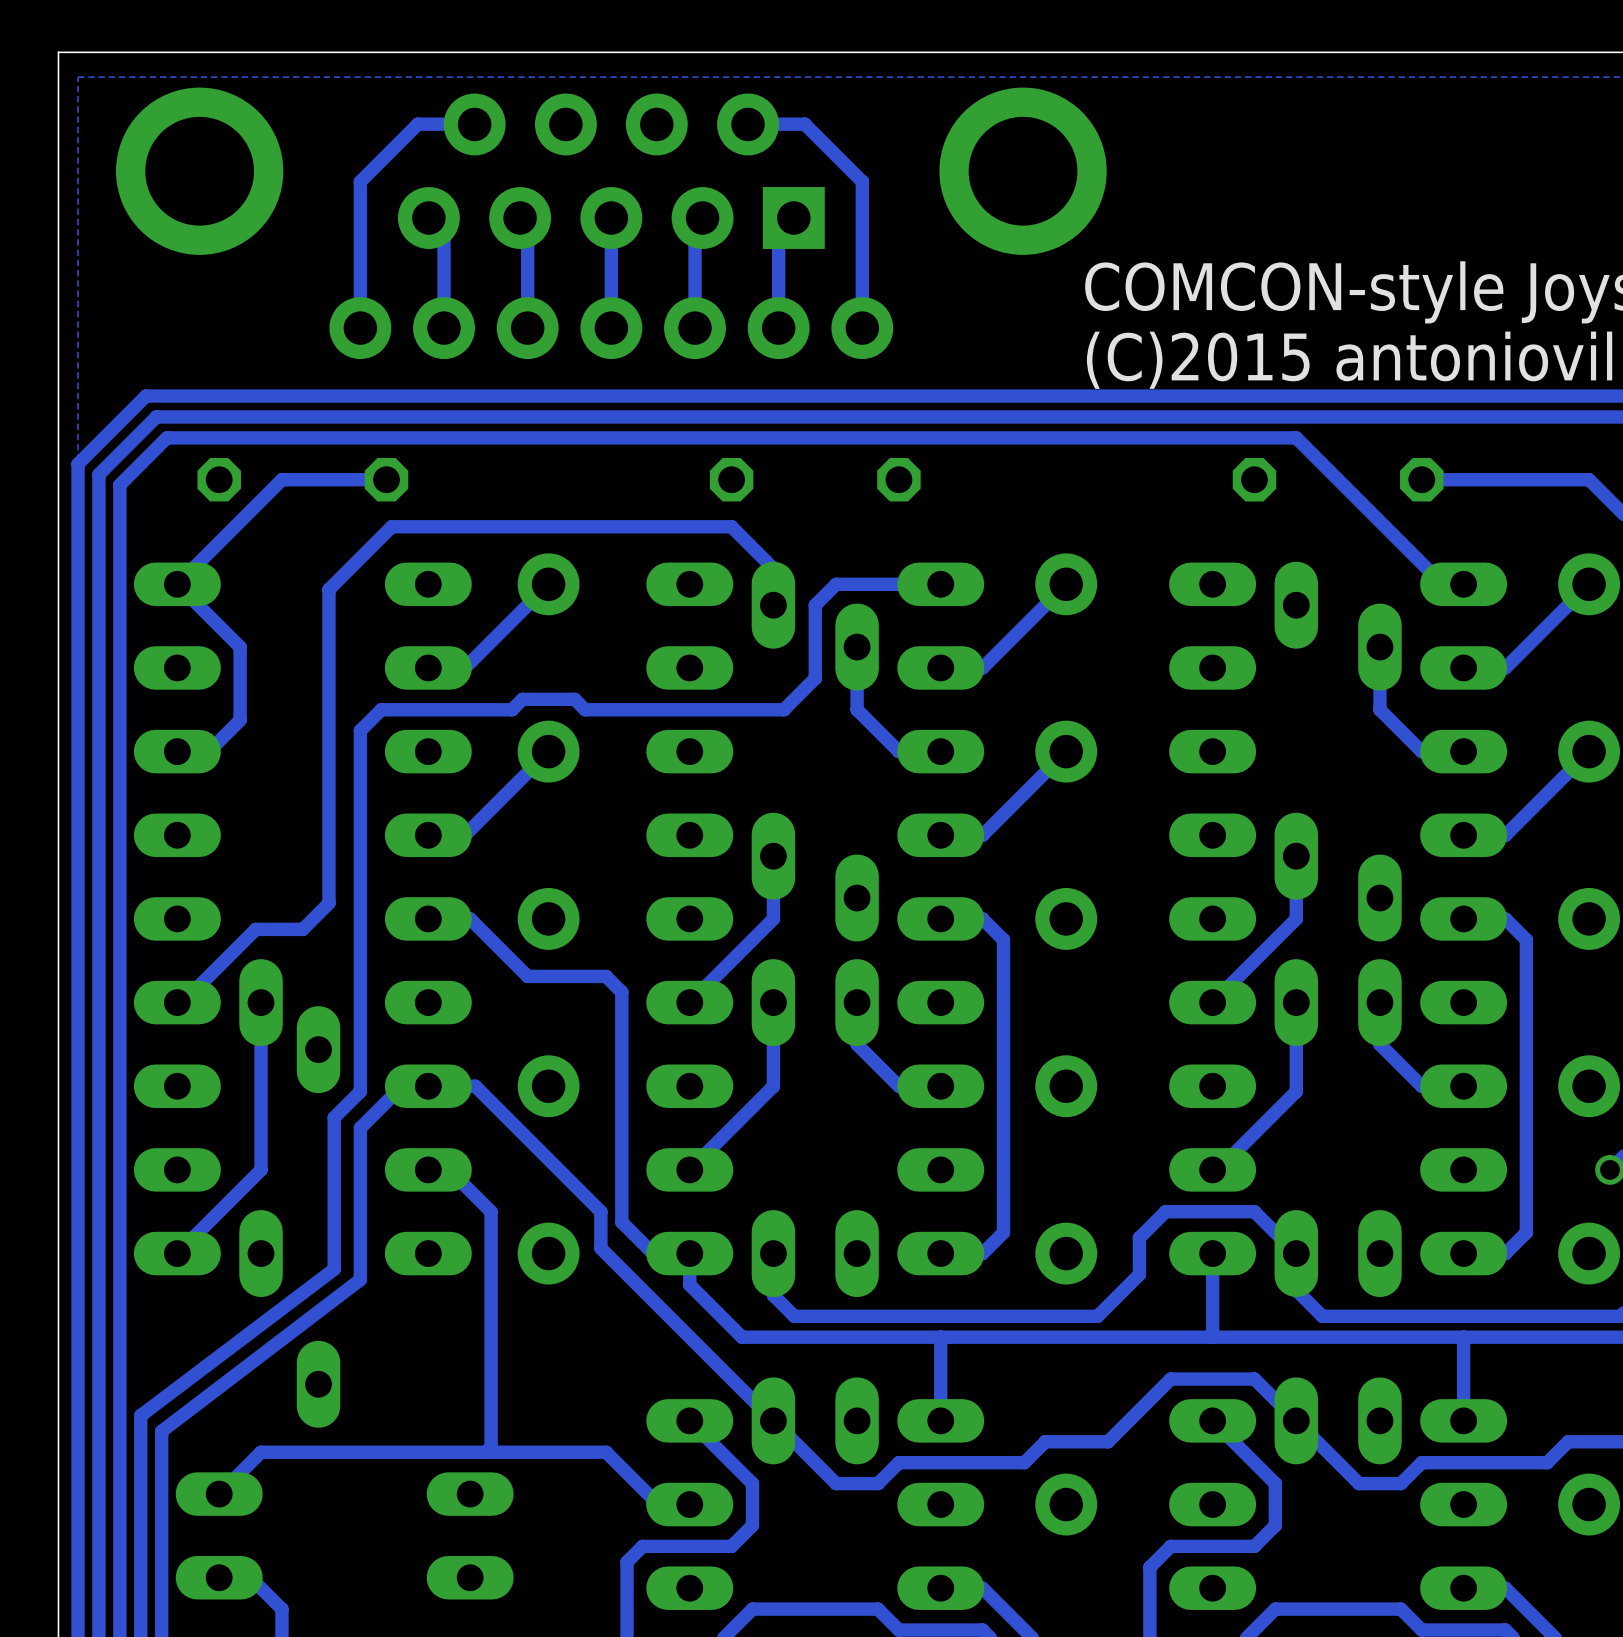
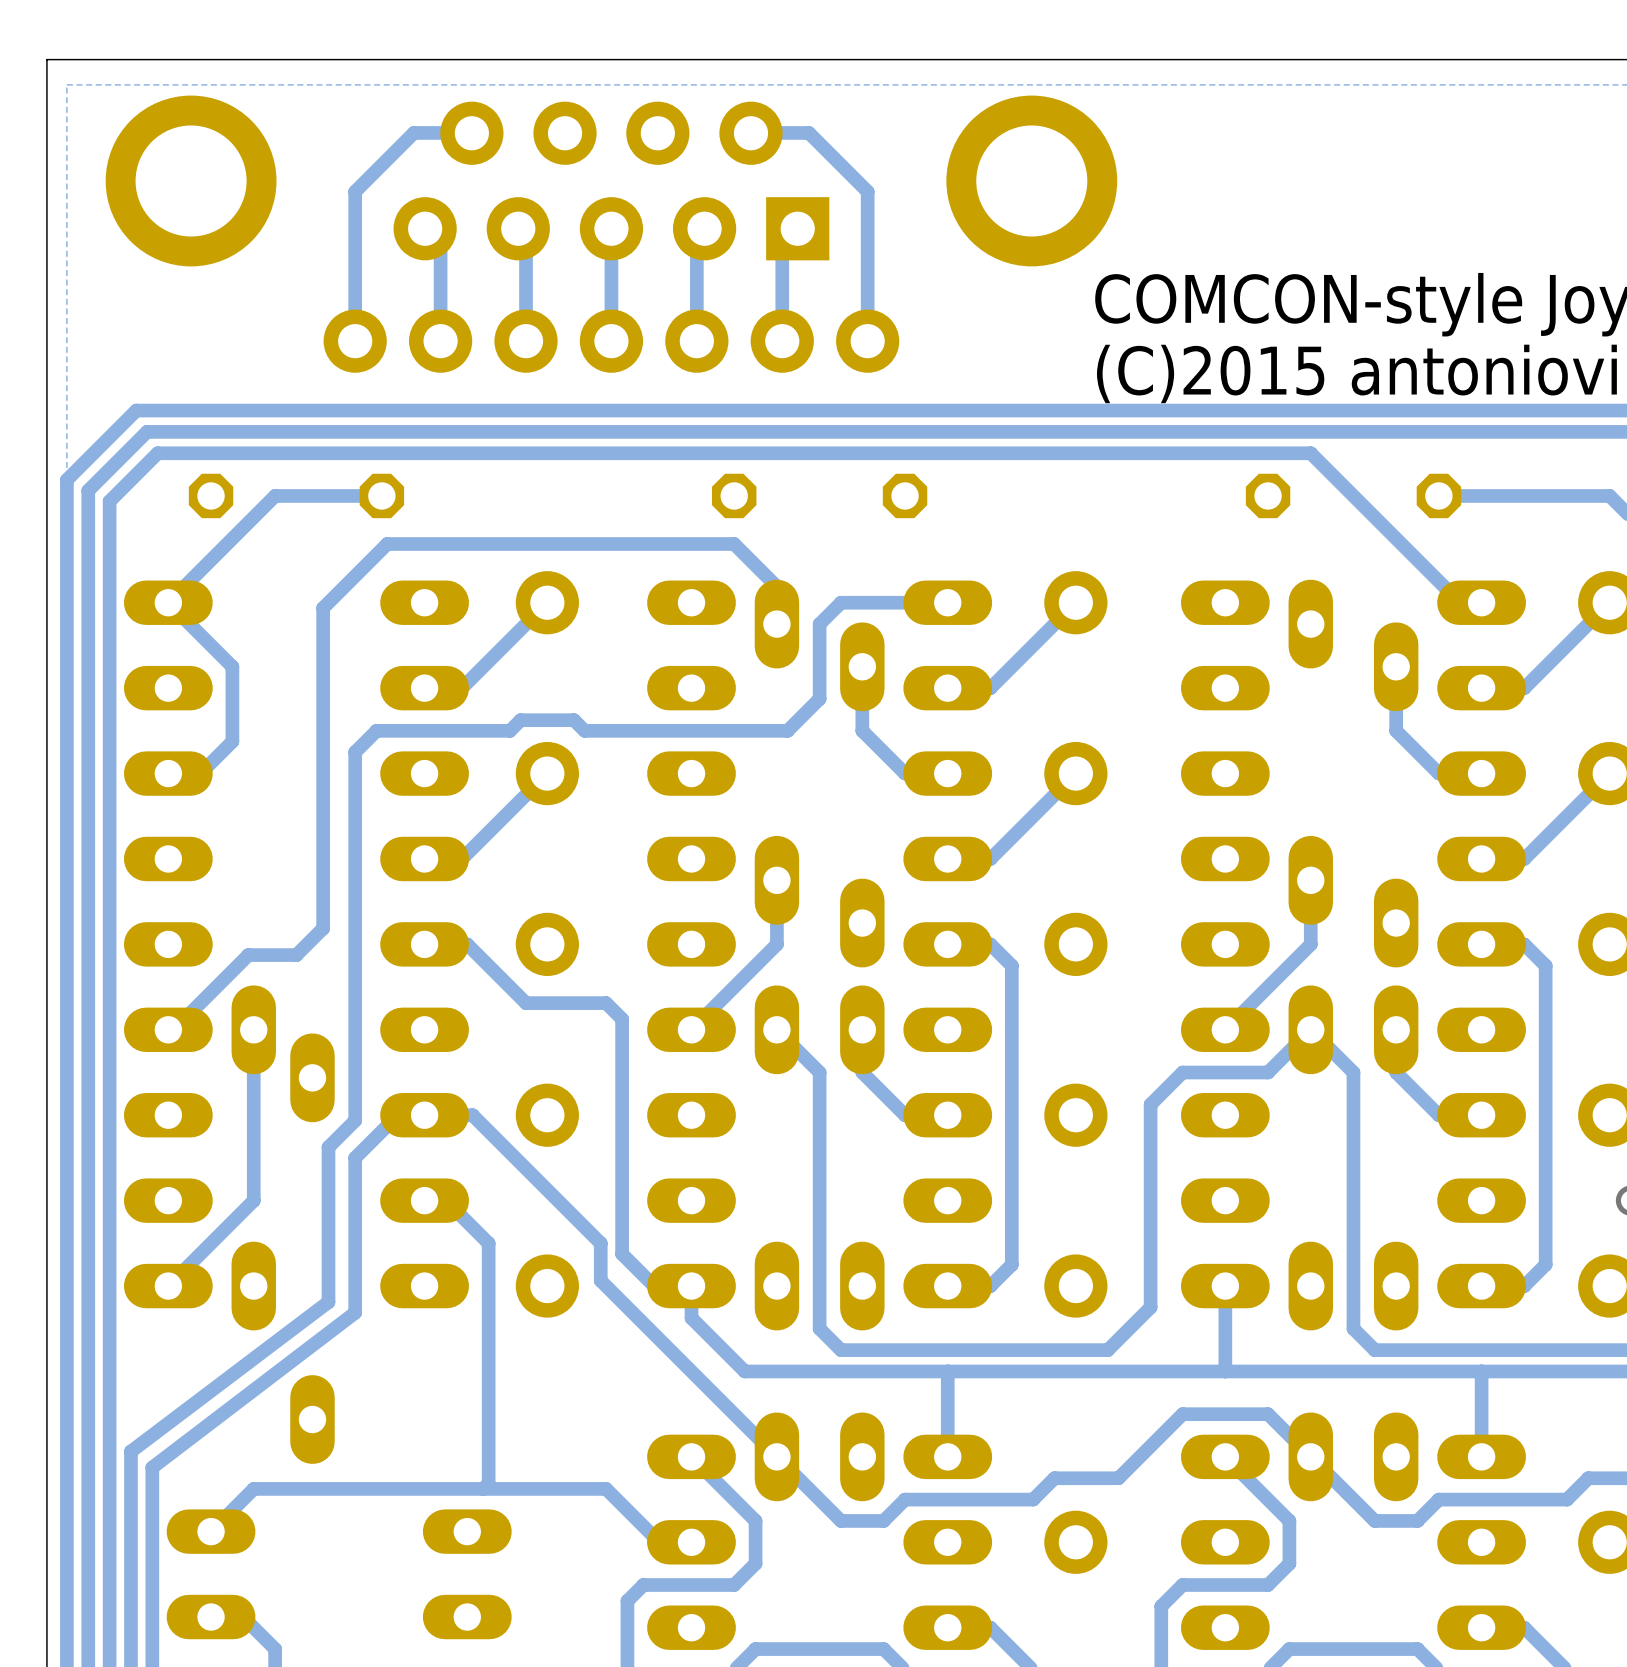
track: (773, 1002) (773, 1086) (689, 1169) -> (776, 1029) (819, 1072) (819, 1328) (840, 1350)
track: (1296, 1002) (1296, 1091) (1217, 1169) (1212, 1169) -> none
track: (1139, 1237) (1165, 1211) (1254, 1211) (1296, 1253) (1296, 1290) (1322, 1316) (1359, 1316) -> (1150, 1270) (1150, 1104) (1182, 1072) (1268, 1072) (1310, 1029) (1353, 1072) (1353, 1328) (1374, 1350)
track: (773, 1253) (773, 1295) (794, 1316) (836, 1316) -> none

